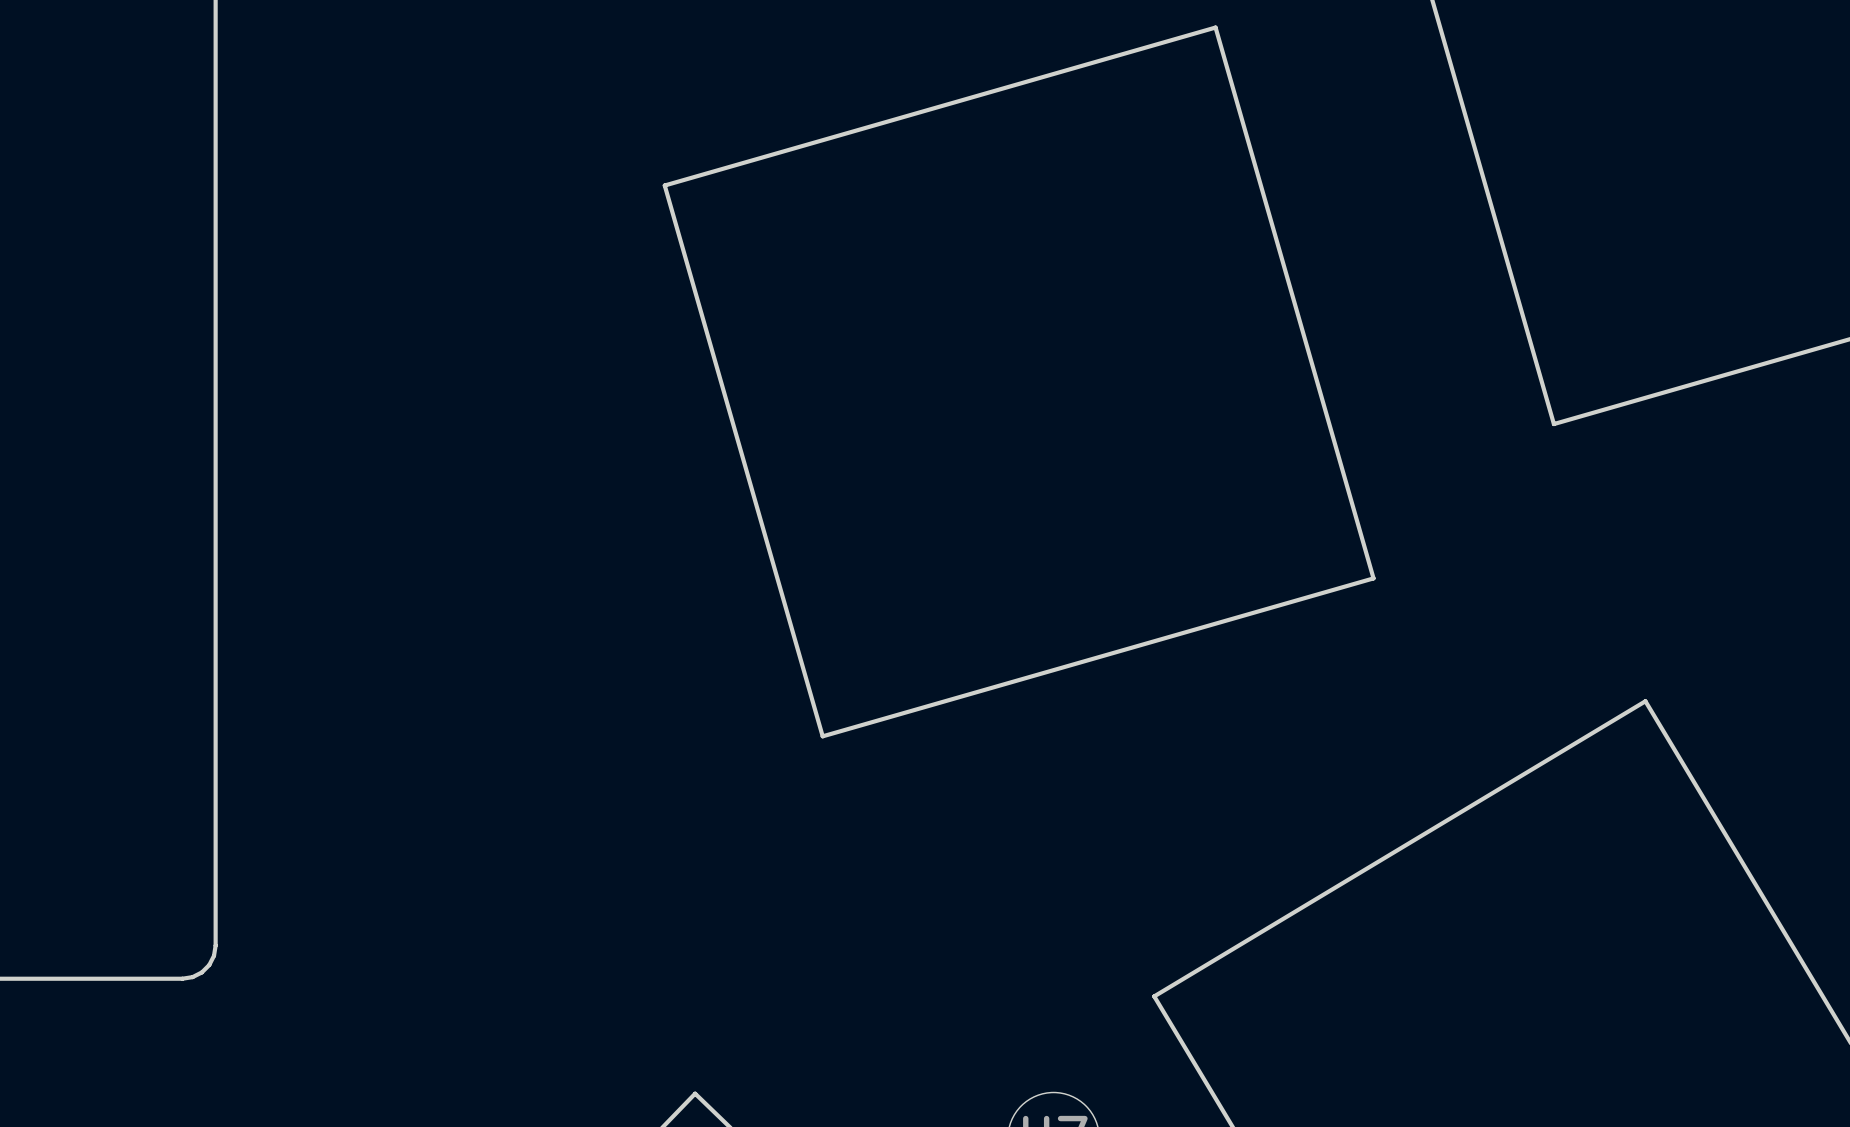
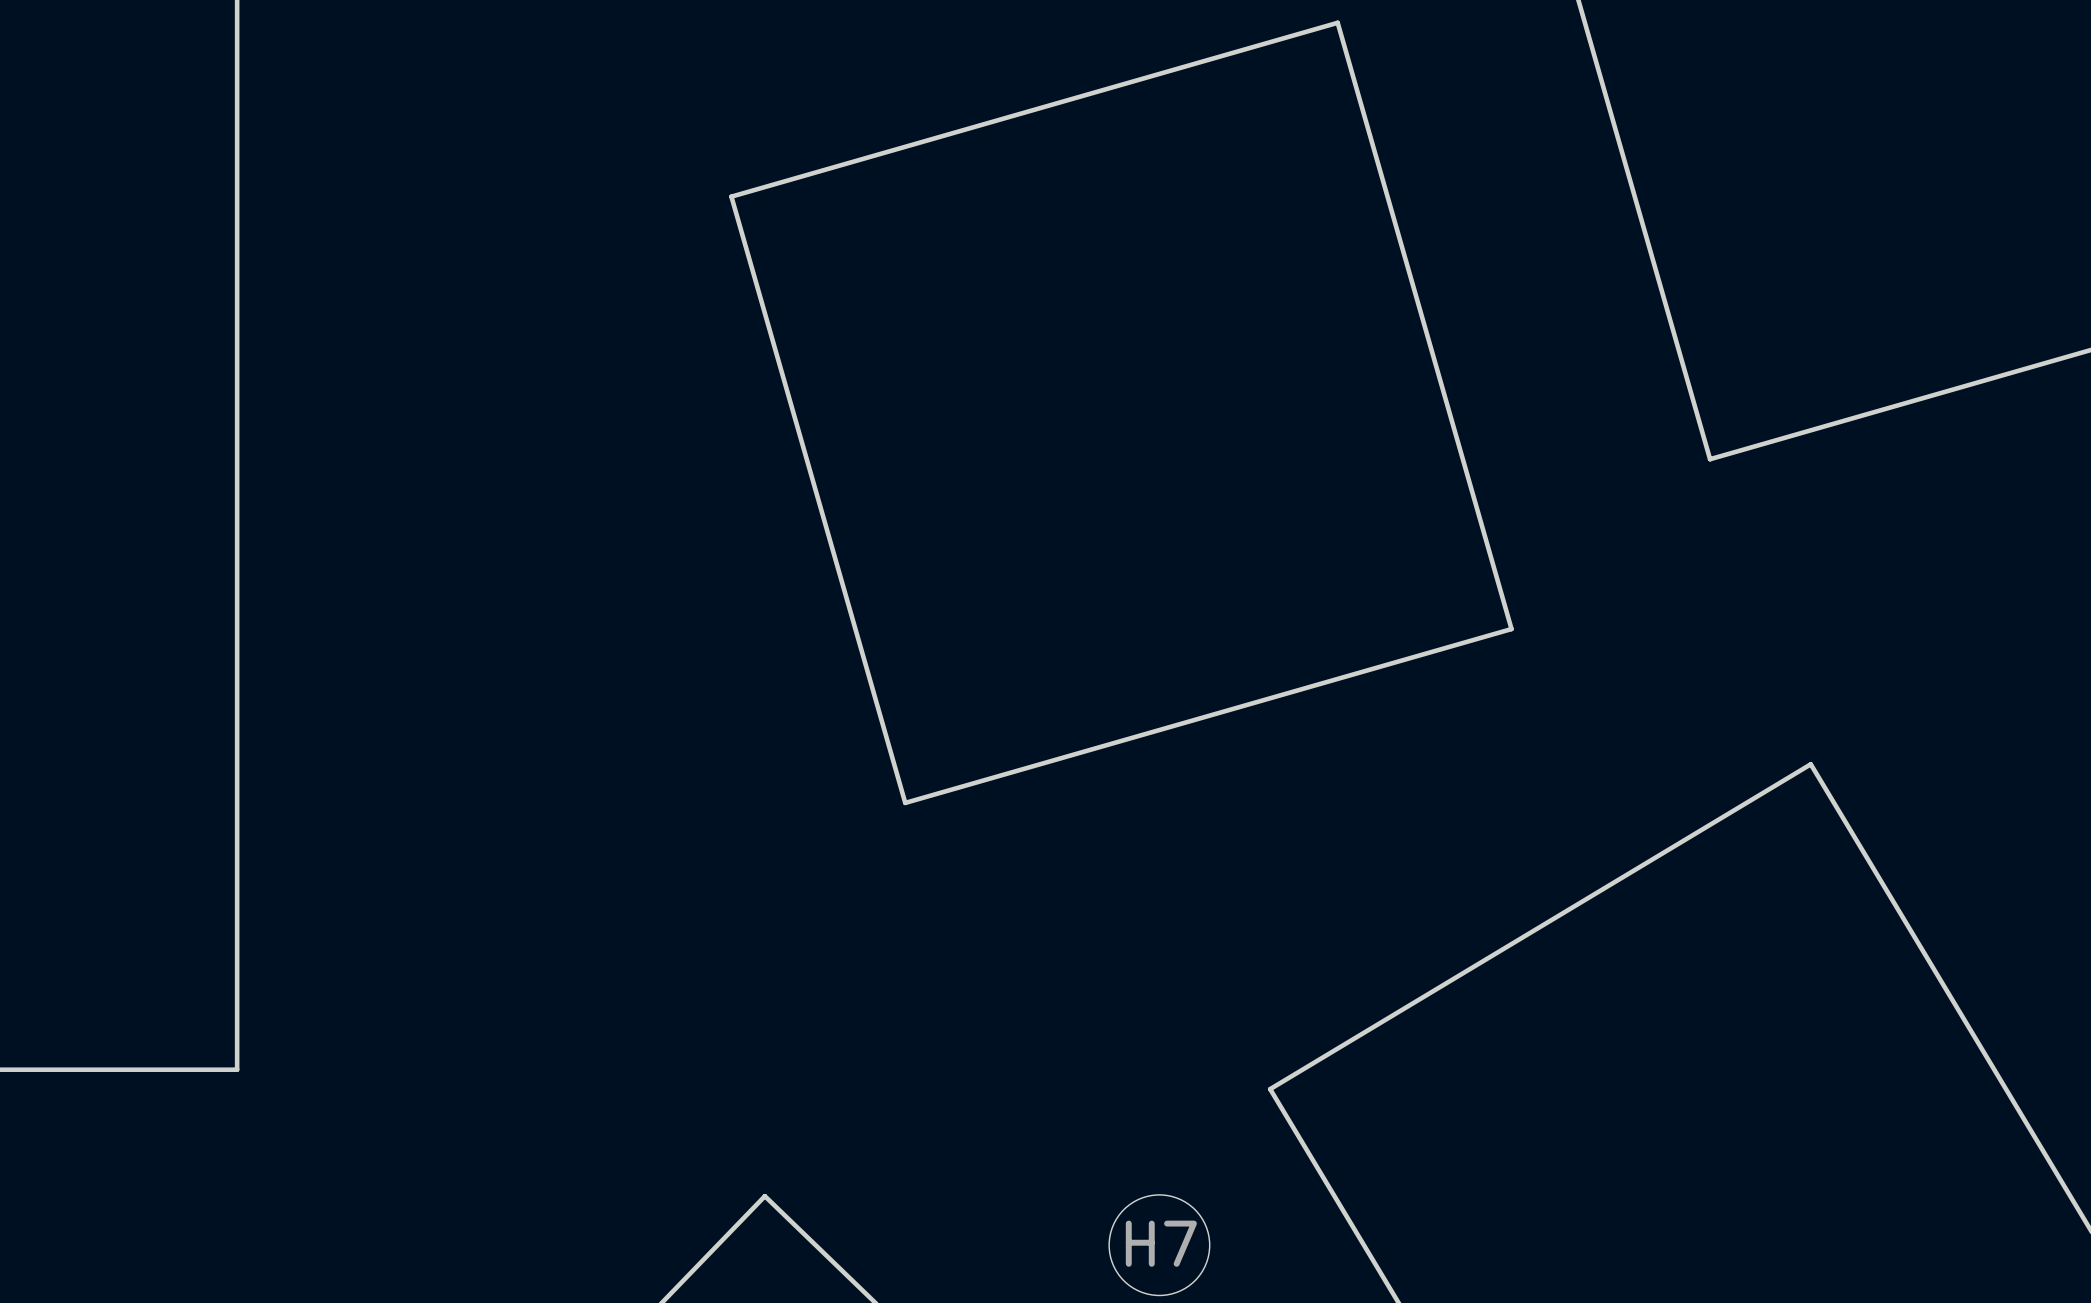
board edge: (215, 945) (214, 955) (209, 965) (201, 972) (192, 977) (182, 978) -> (237, 1033) (237, 1069) (200, 1069)

